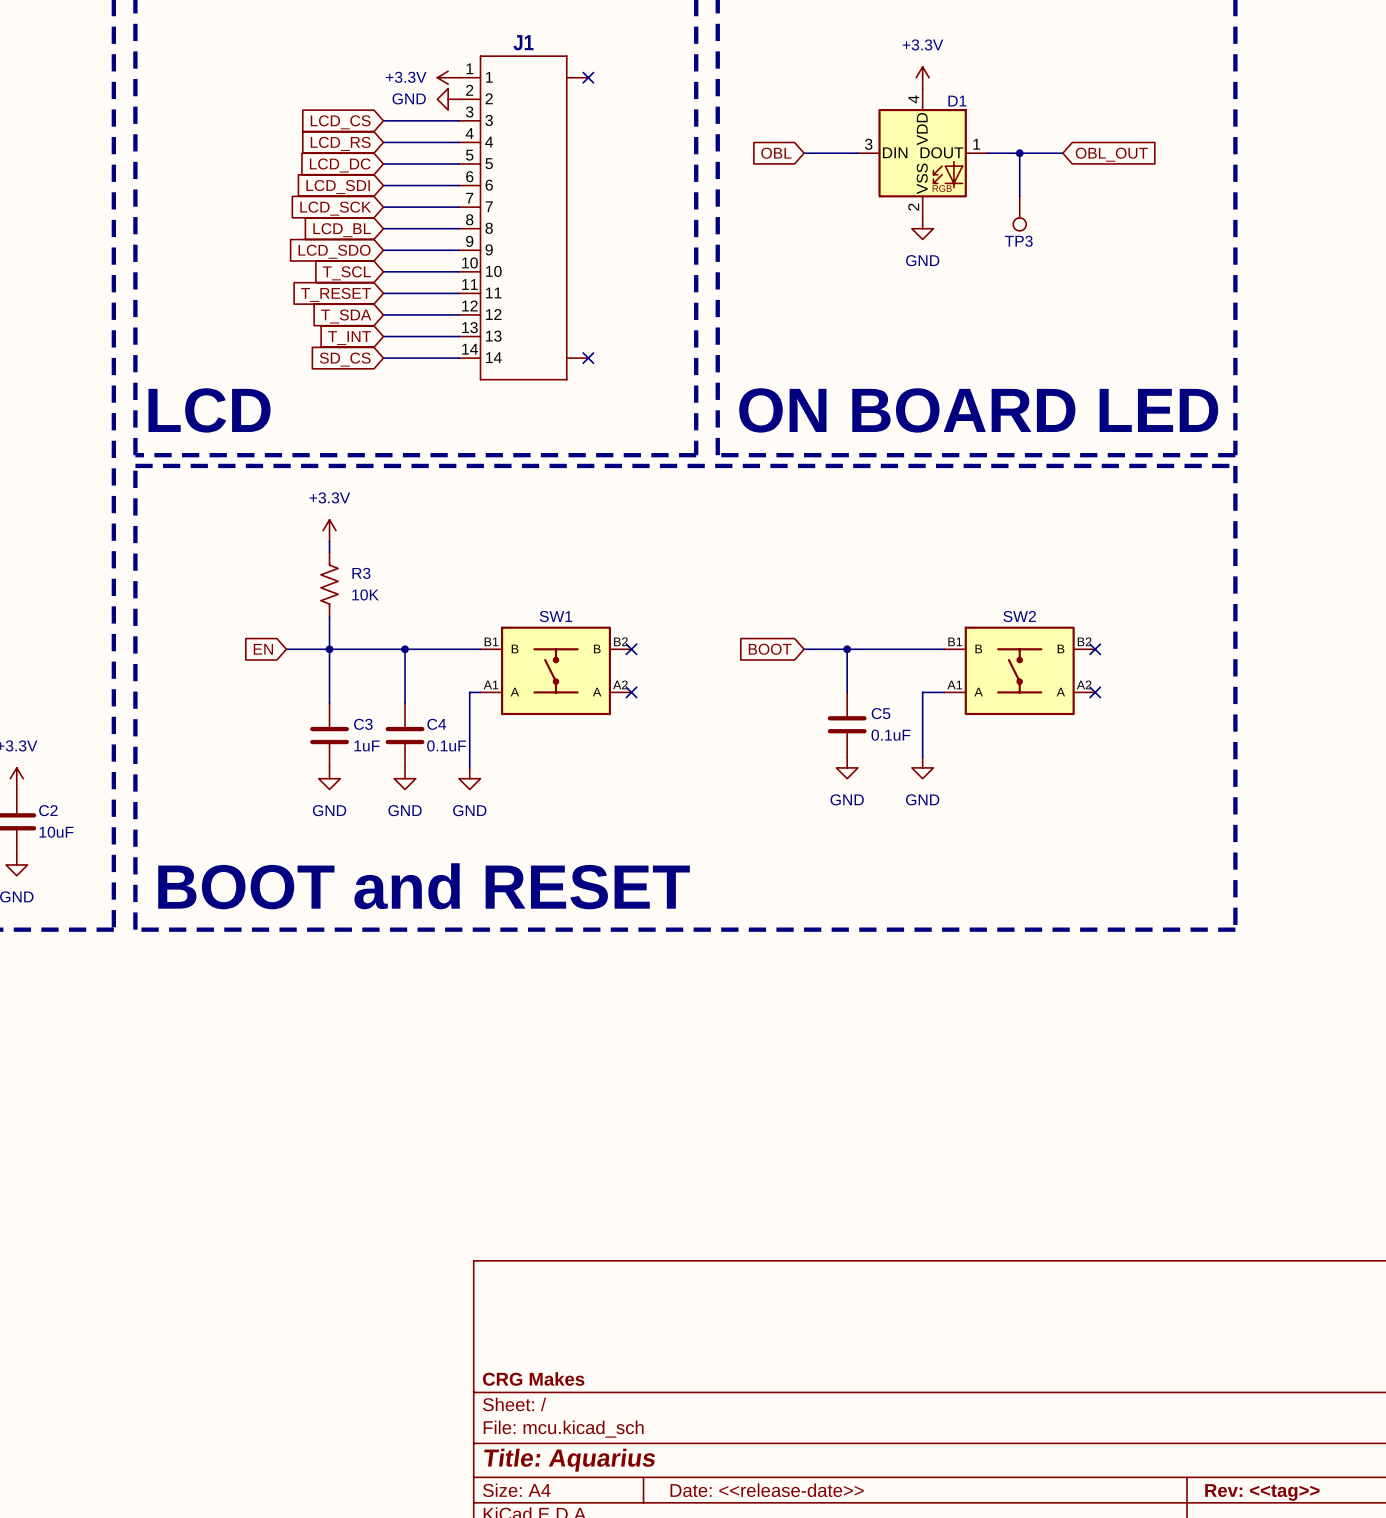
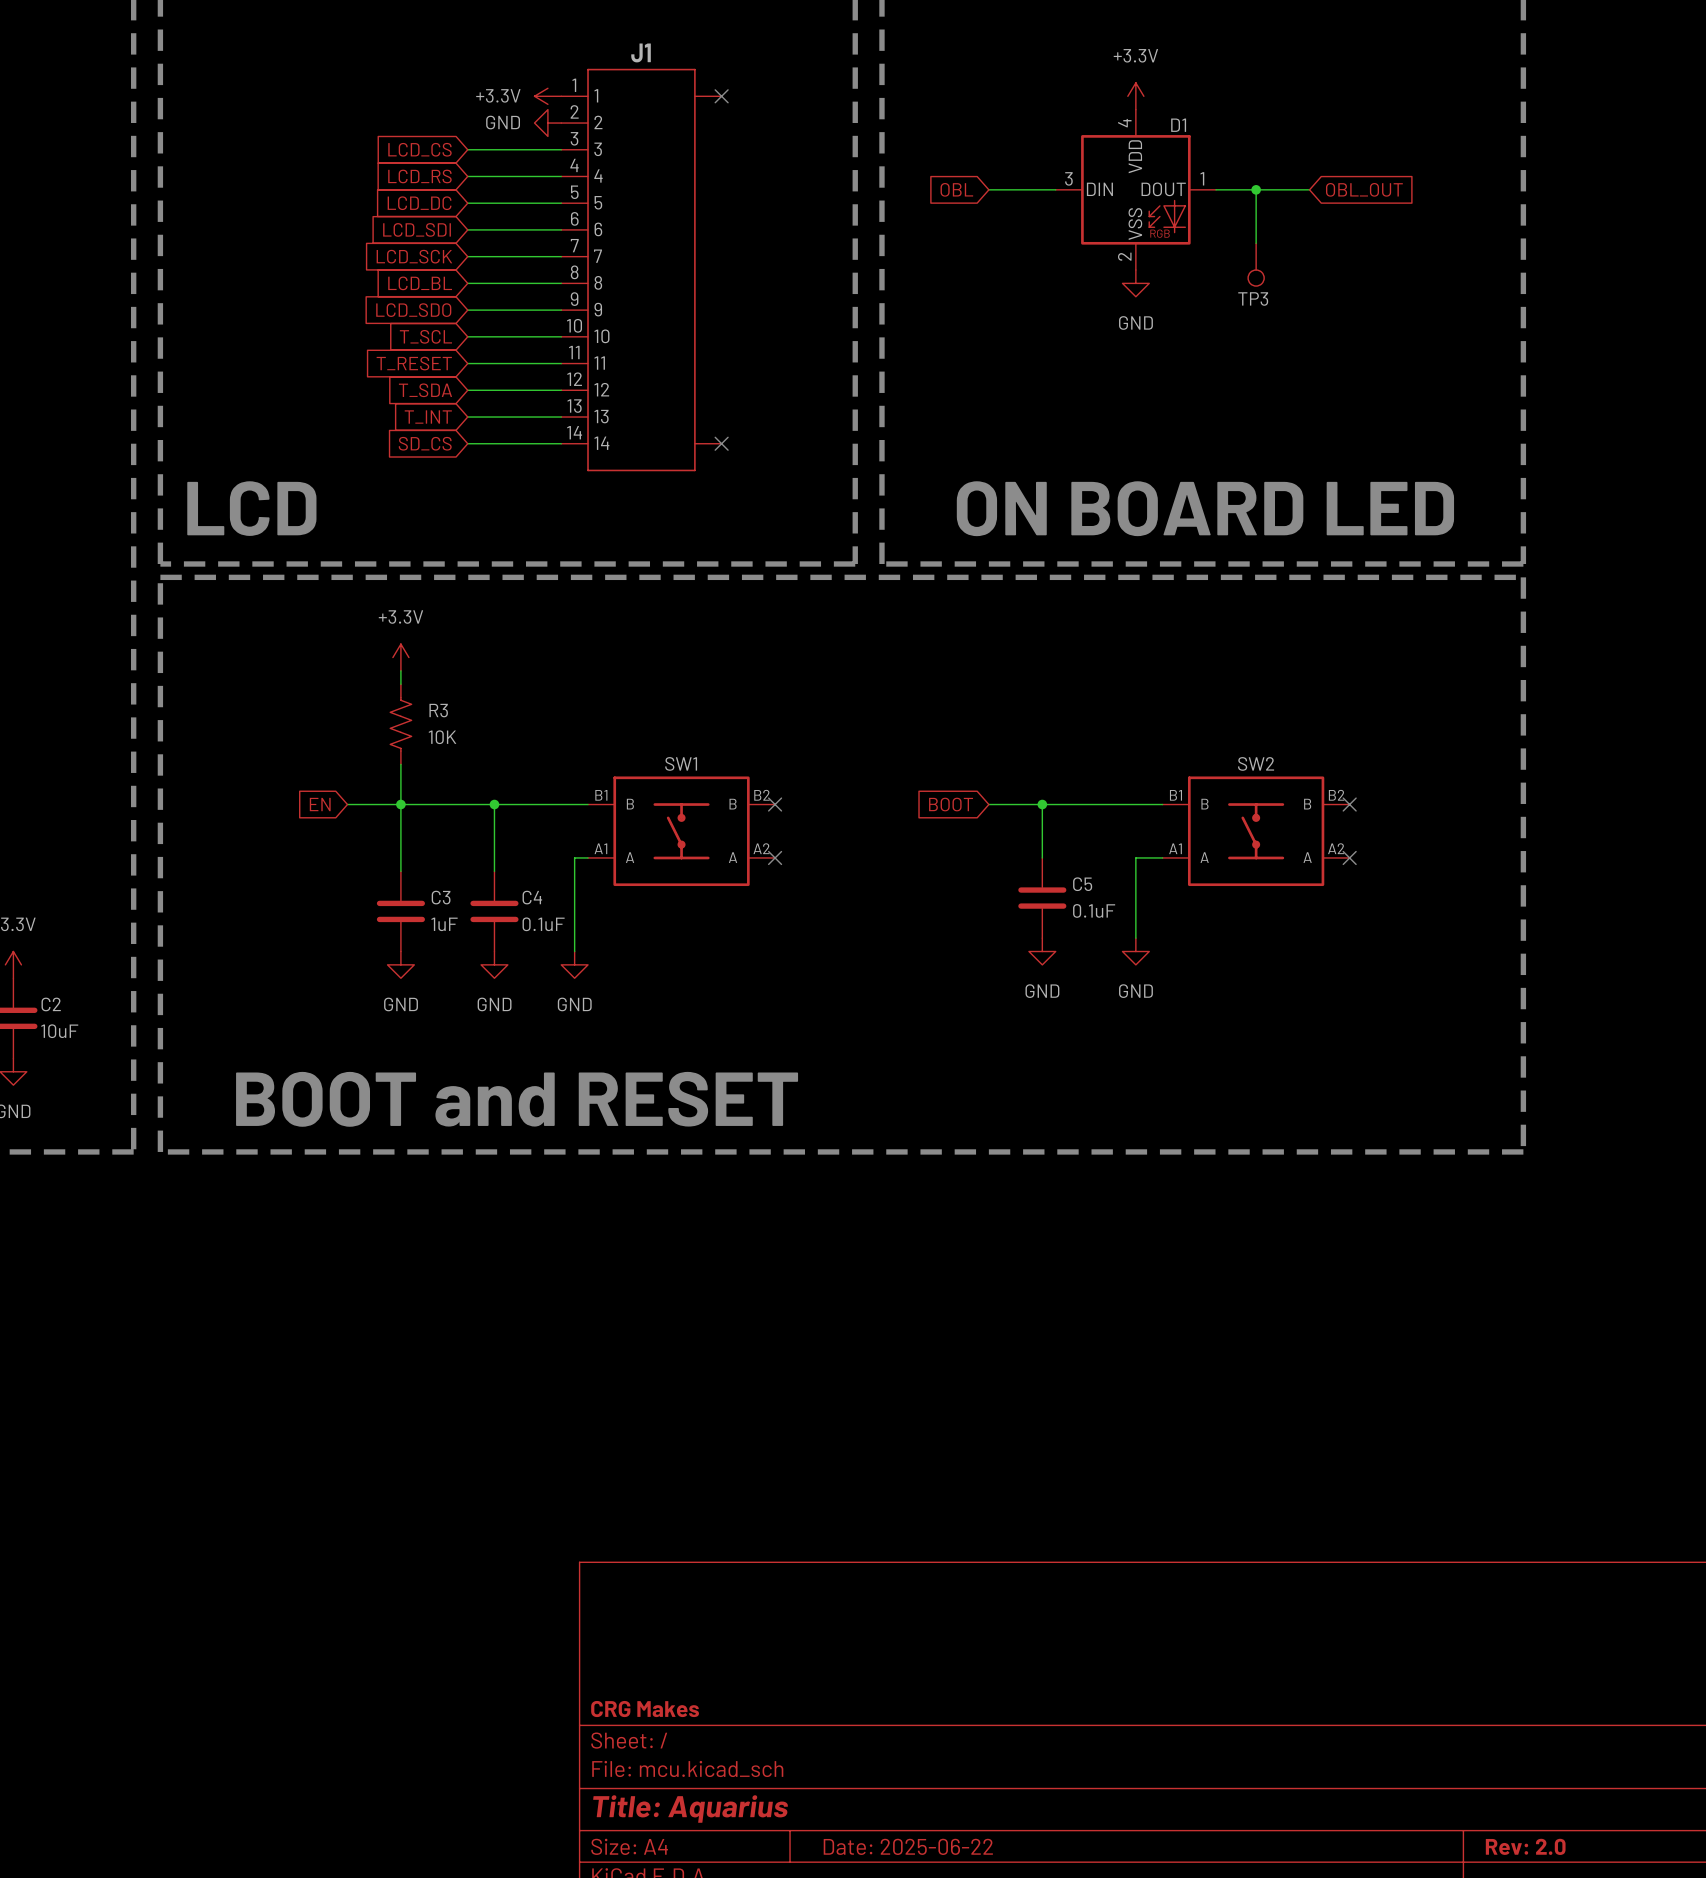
title block: Date: <<release-date>> (767, 1490) -> Date: 2025-06-22 (908, 1846)
title block: Rev: <<tag>> (1262, 1492) -> Rev: 2.0 (1525, 1846)

